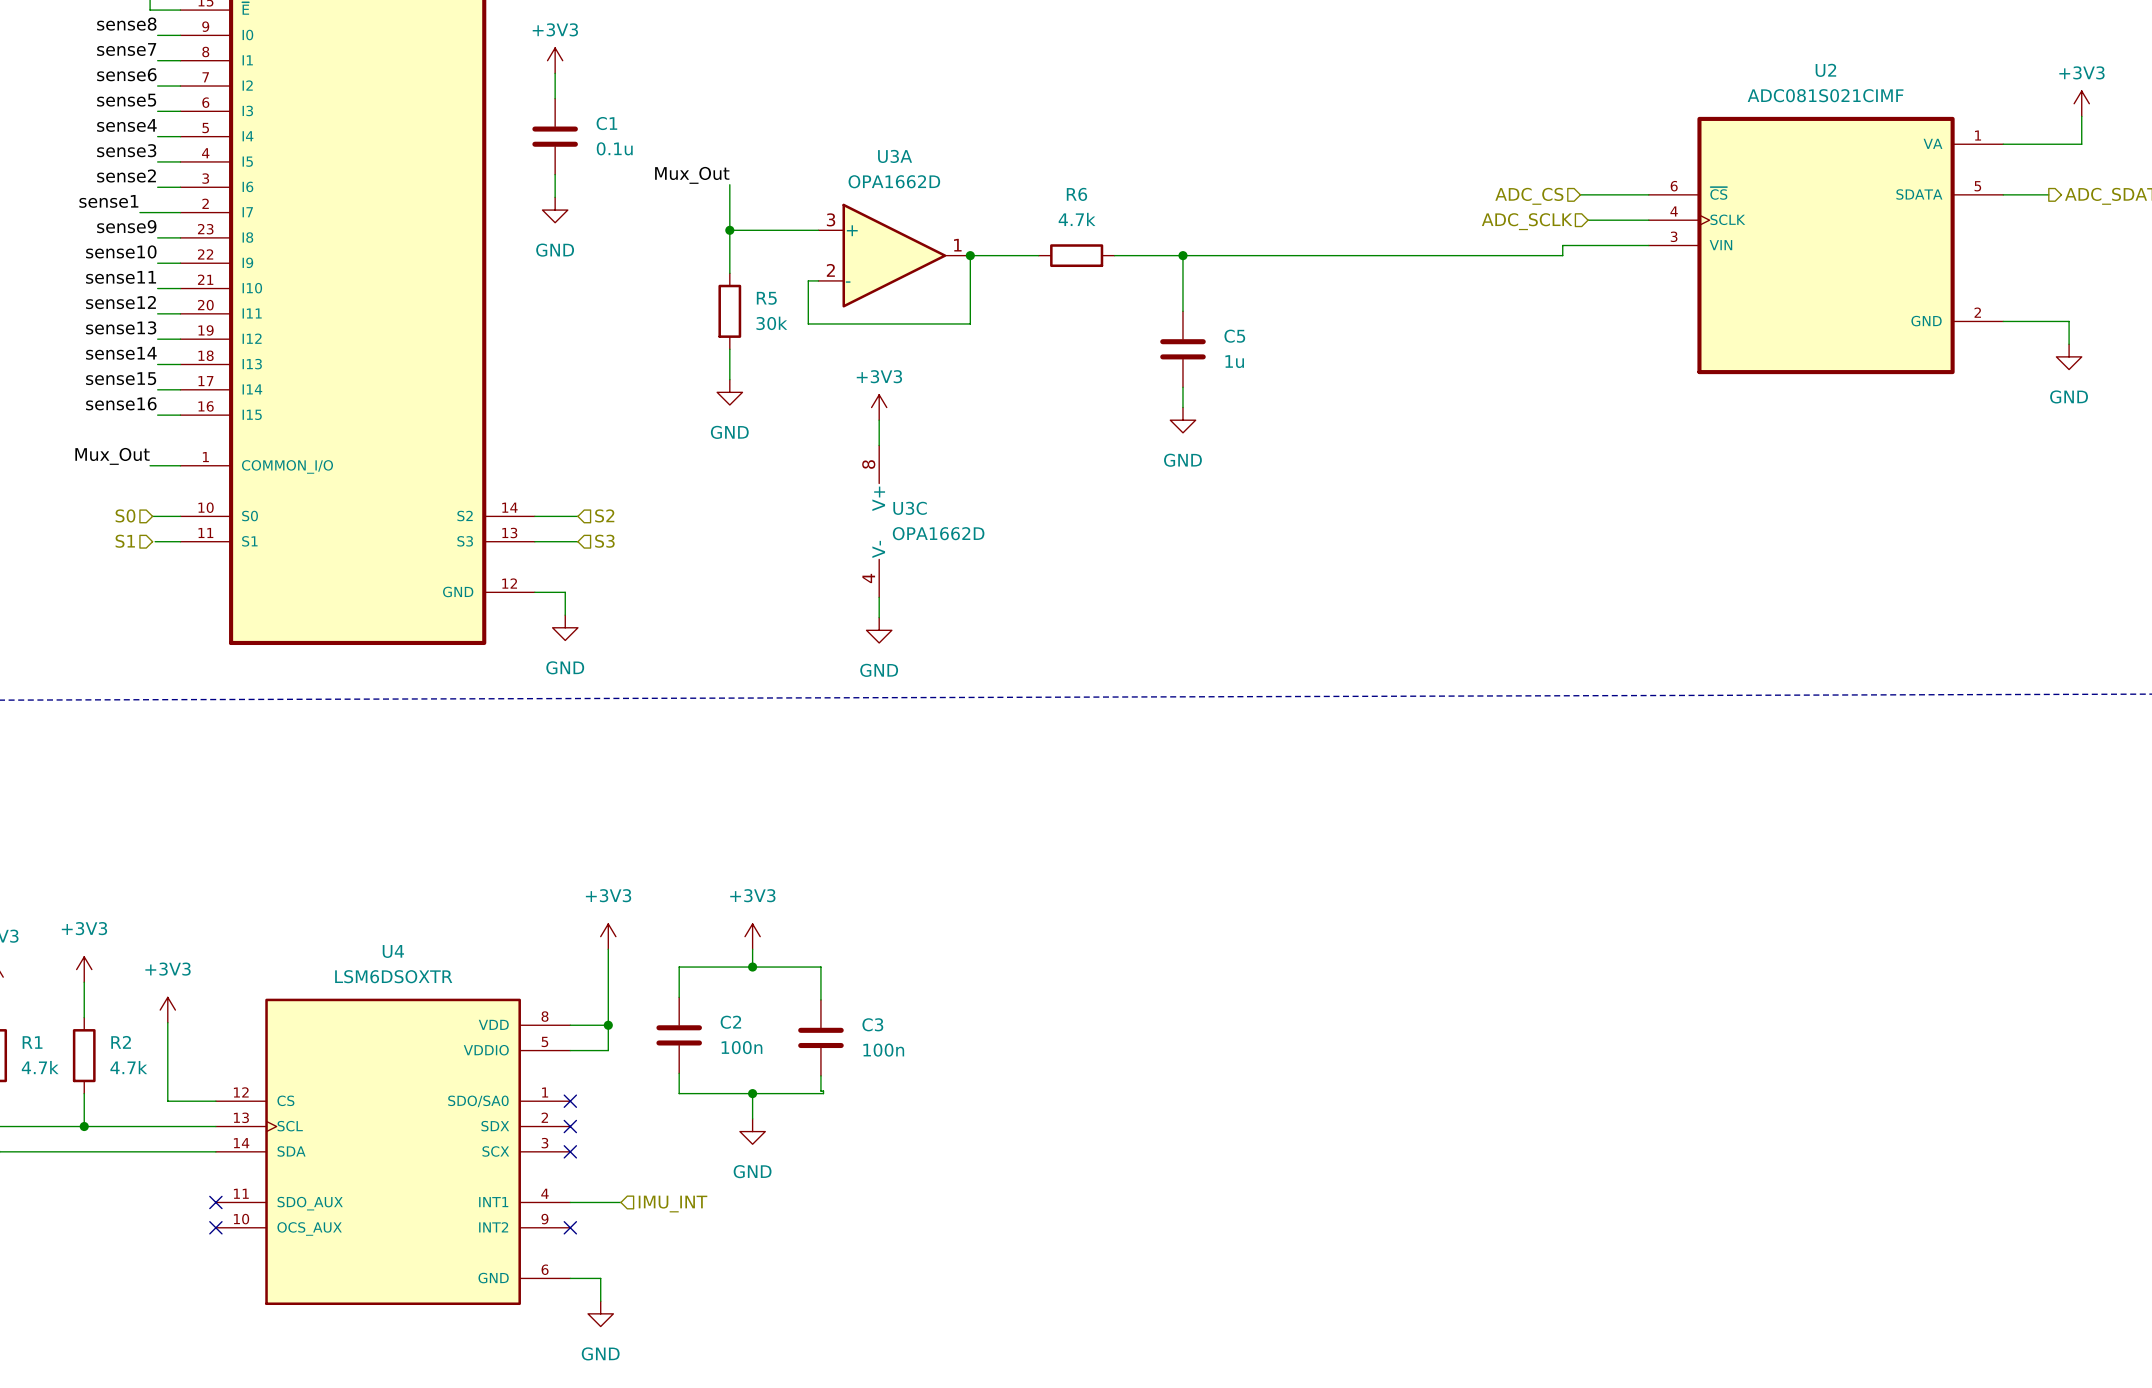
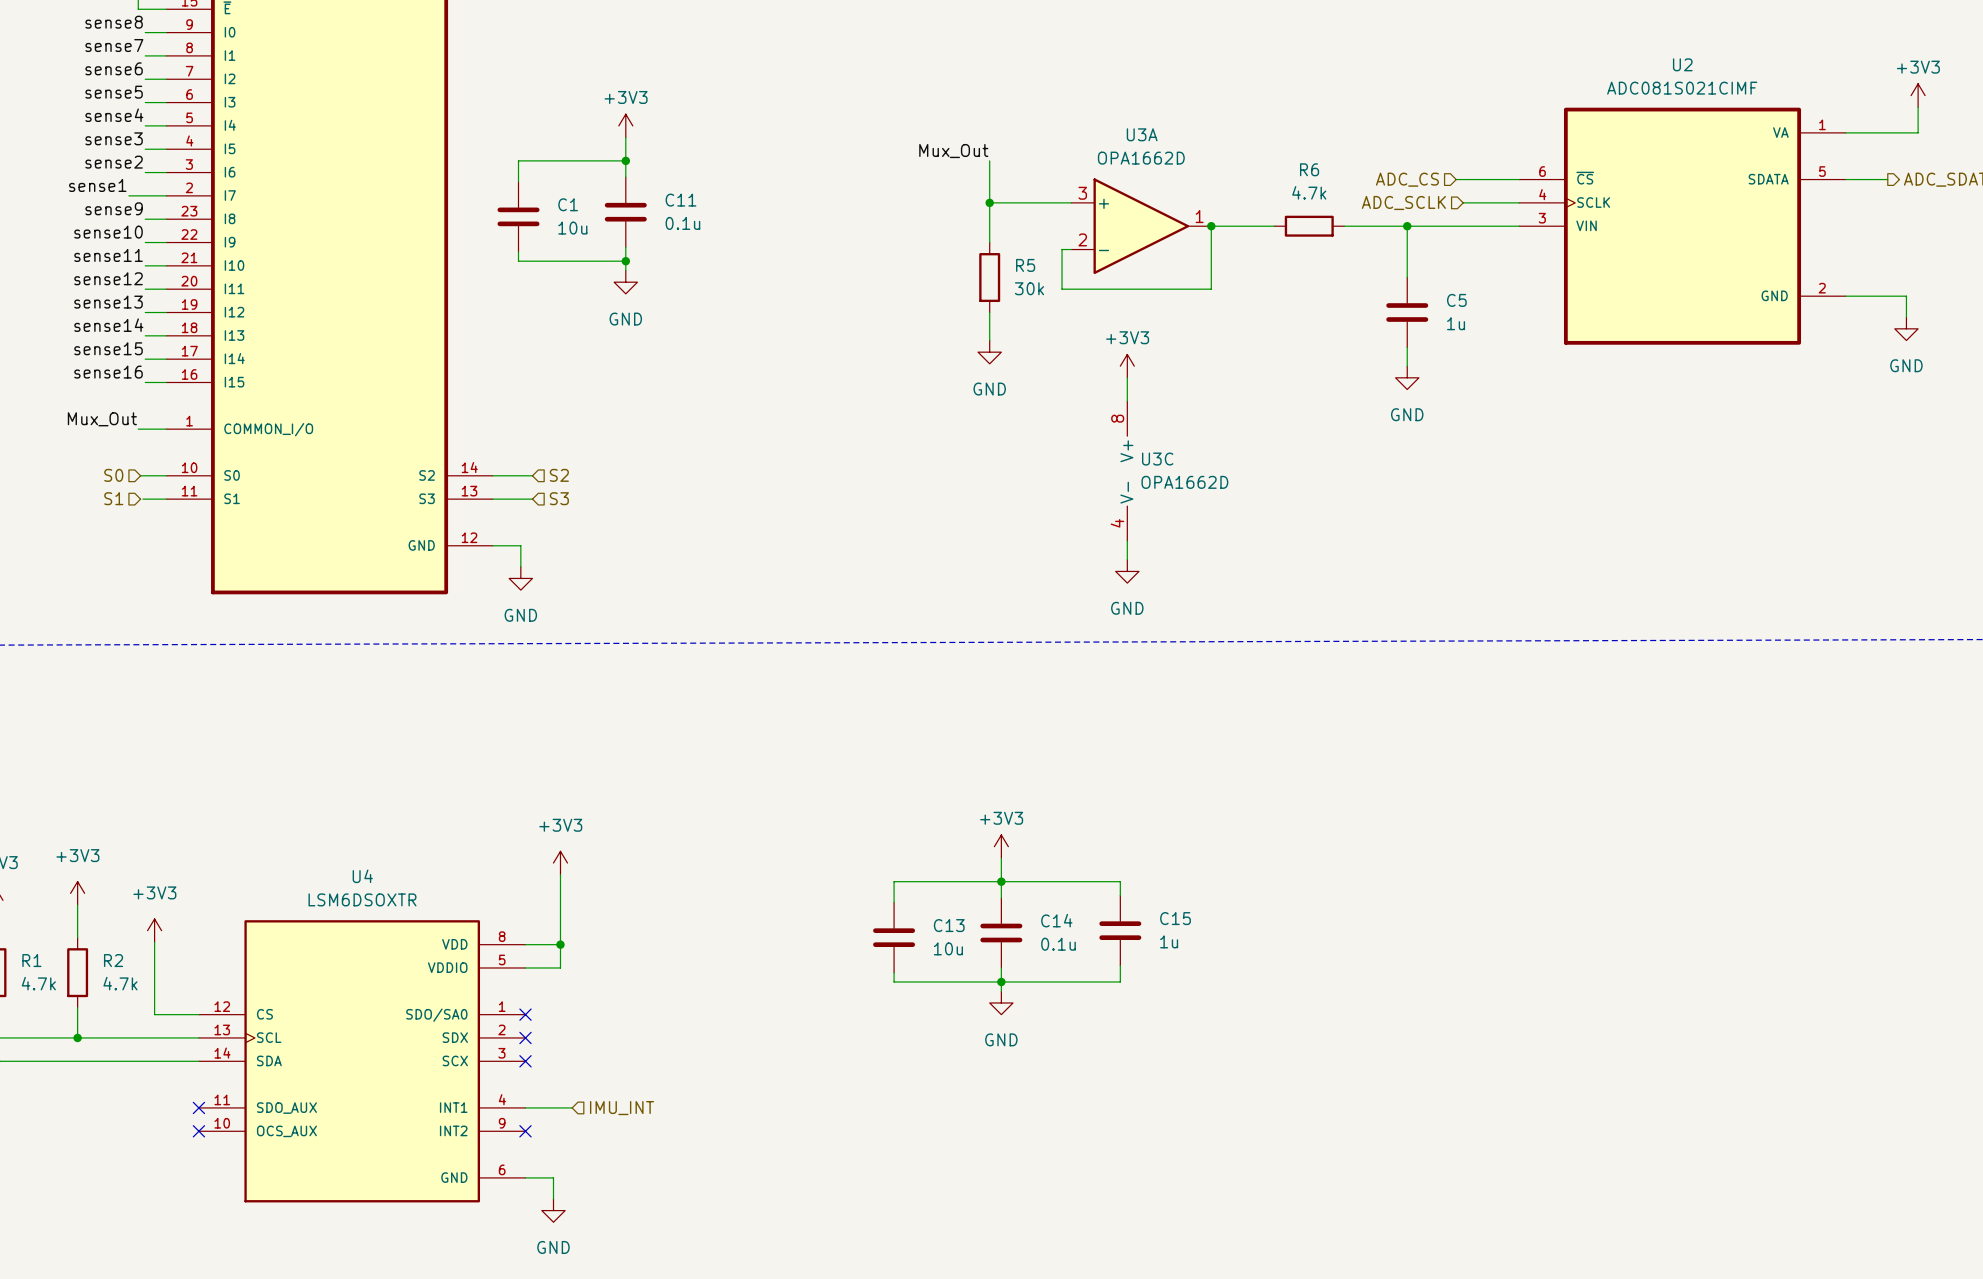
power symbol position: +3V3 (555, 60) -> +3V3 (625, 125)
wire: (555, 73) (555, 98) -> (625, 247) (625, 270)
C1 position: (555, 136) -> (518, 216)
C1 value: 0.1u (614, 148) -> 10u (572, 228)
wire: none -> (625, 137) (625, 177)
label: none -> Mux_Out (953, 151)
wire: (555, 174) (555, 197) -> none
wire: none -> (625, 160) (518, 160) (518, 181)
junction: none -> (625, 160)
wire: none -> (989, 160) (989, 242)
label: Mux_Out (692, 175) -> none
wire: (729, 184) (729, 273) -> none
power symbol: GND (555, 210) -> none
wire: none -> (989, 202) (1071, 202)
junction: none -> (989, 202)
C11: none -> 0.1u (625, 212)
wire: (729, 230) (818, 230) -> none
junction: (729, 230) -> none
junction: none -> (1211, 226)
wire: none -> (1274, 226) (1211, 226) (1211, 289) (1062, 289) (1062, 249) (1071, 249)
wire: none -> (1407, 226) (1407, 277)
junction: none -> (1407, 226)
wire: (1562, 245) (1562, 255) (1114, 255) -> (1439, 226) (1344, 226)
U3A position: (894, 255) -> (1141, 226)
junction: (970, 255) -> none
wire: (1038, 255) (970, 255) (970, 323) (808, 323) (808, 280) (818, 280) -> none
R6 position: (1076, 255) -> (1309, 226)
wire: (1182, 255) (1182, 311) -> none
junction: (1182, 255) -> none
wire: none -> (518, 251) (518, 261) (625, 261)
junction: none -> (625, 261)
power symbol: none -> GND (625, 282)
R5 position: (729, 311) -> (989, 277)
wire: none -> (989, 312) (989, 340)
wire: (729, 349) (729, 379) -> none
C5 position: (1182, 349) -> (1407, 312)
wire: none -> (1407, 347) (1407, 366)
power symbol: none -> GND (989, 352)
wire: (1182, 387) (1182, 407) -> (1127, 541) (1127, 559)
power symbol: GND (729, 392) -> none
power symbol: none -> +3V3 (1127, 366)
power symbol: +3V3 (879, 407) -> none
wire: none -> (1127, 377) (1127, 401)
power symbol: none -> GND (1407, 377)
wire: (879, 420) (879, 445) -> none
power symbol: GND (1182, 420) -> none
U3C position: (879, 521) -> (1127, 471)
wire: (879, 597) (879, 617) -> none
power symbol: none -> GND (1127, 571)
power symbol: GND (879, 630) -> none
power symbol: none -> +3V3 (1001, 846)
wire: none -> (1001, 858) (1001, 898)
power symbol: +3V3 (752, 936) -> none
wire: (752, 949) (752, 967) -> none
junction: none -> (1001, 881)
junction: (752, 967) -> none
wire: none -> (1120, 895) (1120, 881) (894, 881) (894, 902)
wire: (679, 997) (679, 967) (820, 967) (820, 999) -> none
C15: none -> 1u (1120, 930)
C14: none -> 0.1u (1001, 933)
C13: none -> 10u (894, 937)
C2: 100n (679, 1035) -> none
C3: 100n (820, 1037) -> none
wire: none -> (1120, 965) (1120, 981) (894, 981) (894, 972)
wire: none -> (1001, 967) (1001, 991)
junction: none -> (1001, 981)
wire: (679, 1073) (679, 1093) (823, 1093) (823, 1091) (820, 1091) (820, 1075) -> none
power symbol: none -> GND (1001, 1002)
wire: (752, 1093) (752, 1118) -> none
junction: (752, 1093) -> none
power symbol: GND (752, 1131) -> none

